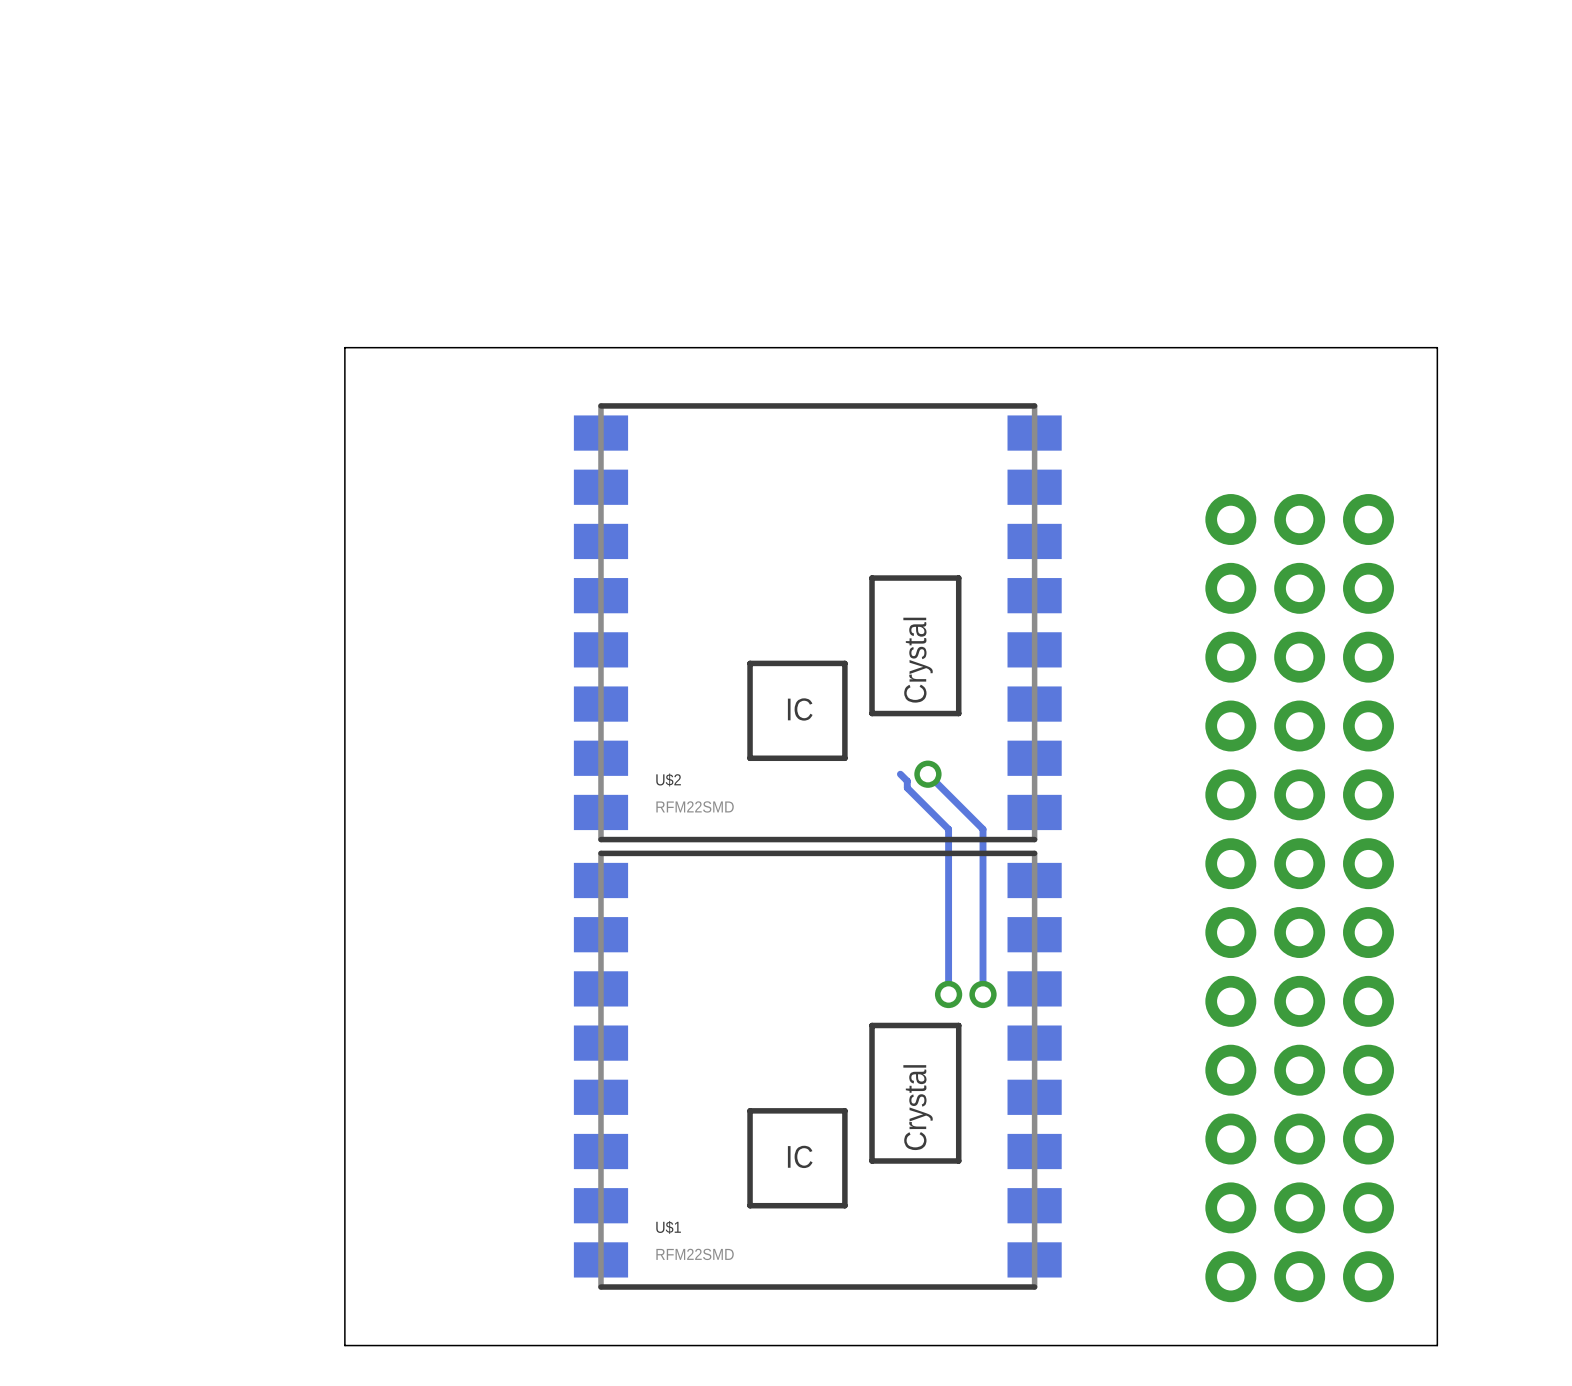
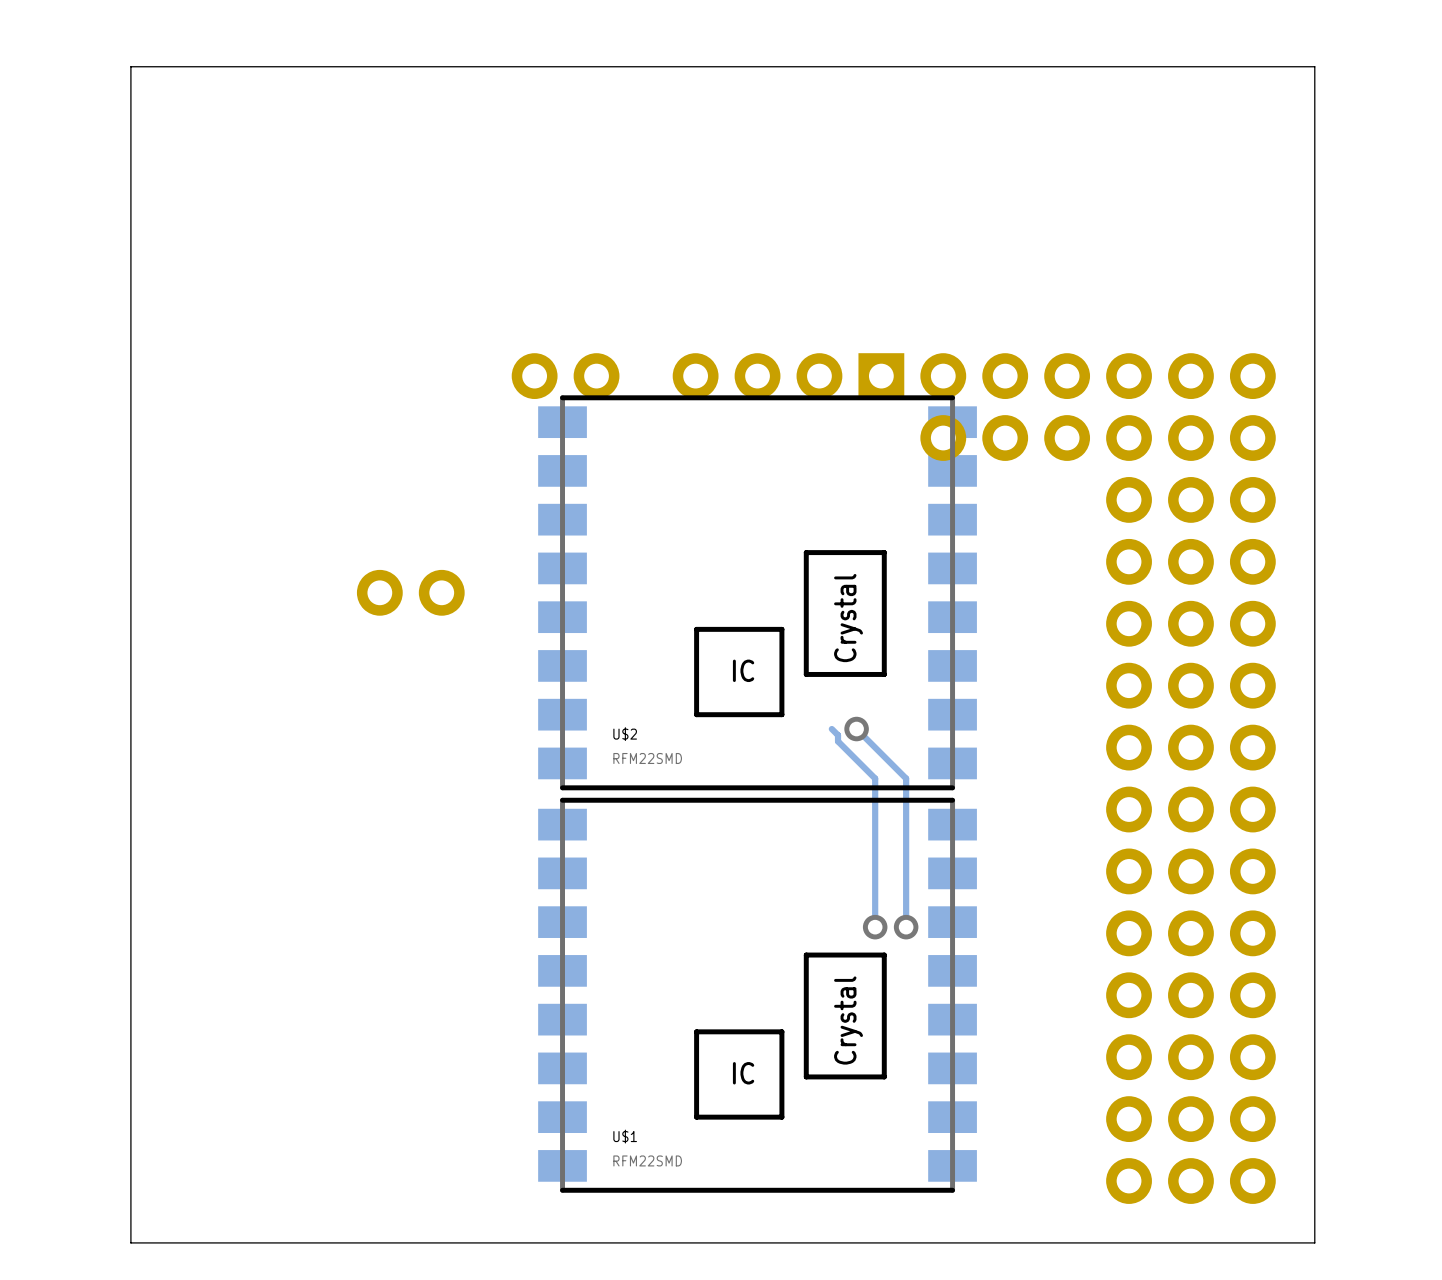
board edge: (1437, 347) (344, 347) (344, 1345) -> (1314, 345) (1314, 66) (130, 66) (130, 1242) (332, 1242)
part: none -> (565, 376)
part: none -> (788, 376)
part: none -> (1098, 376)
part: none -> (1098, 438)
part: none -> (410, 592)

